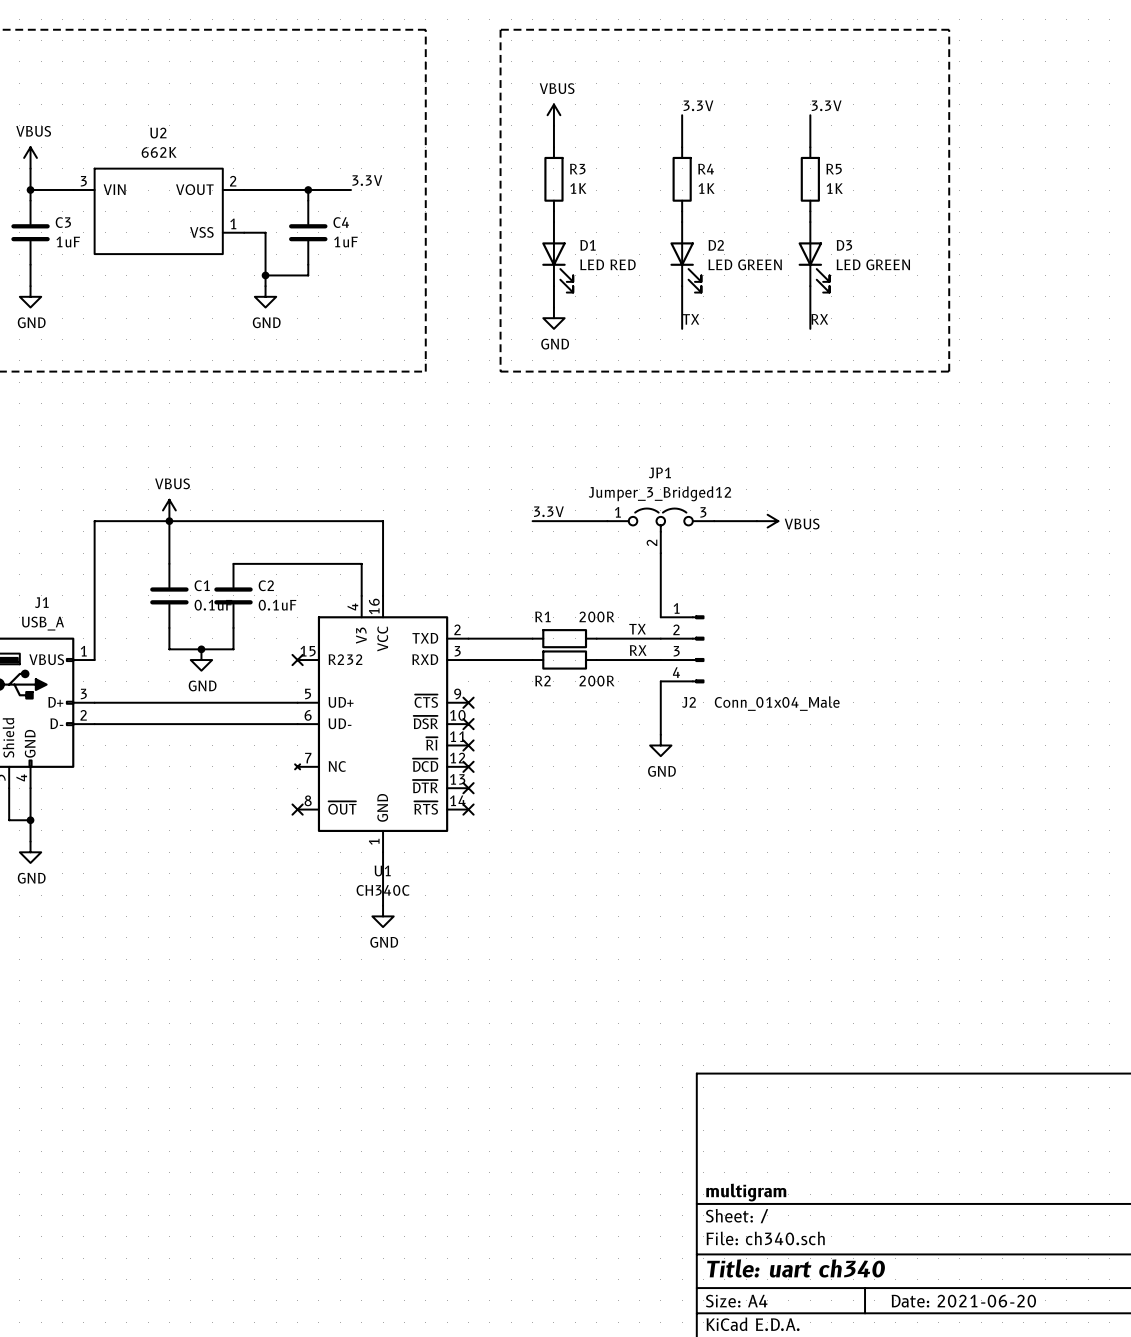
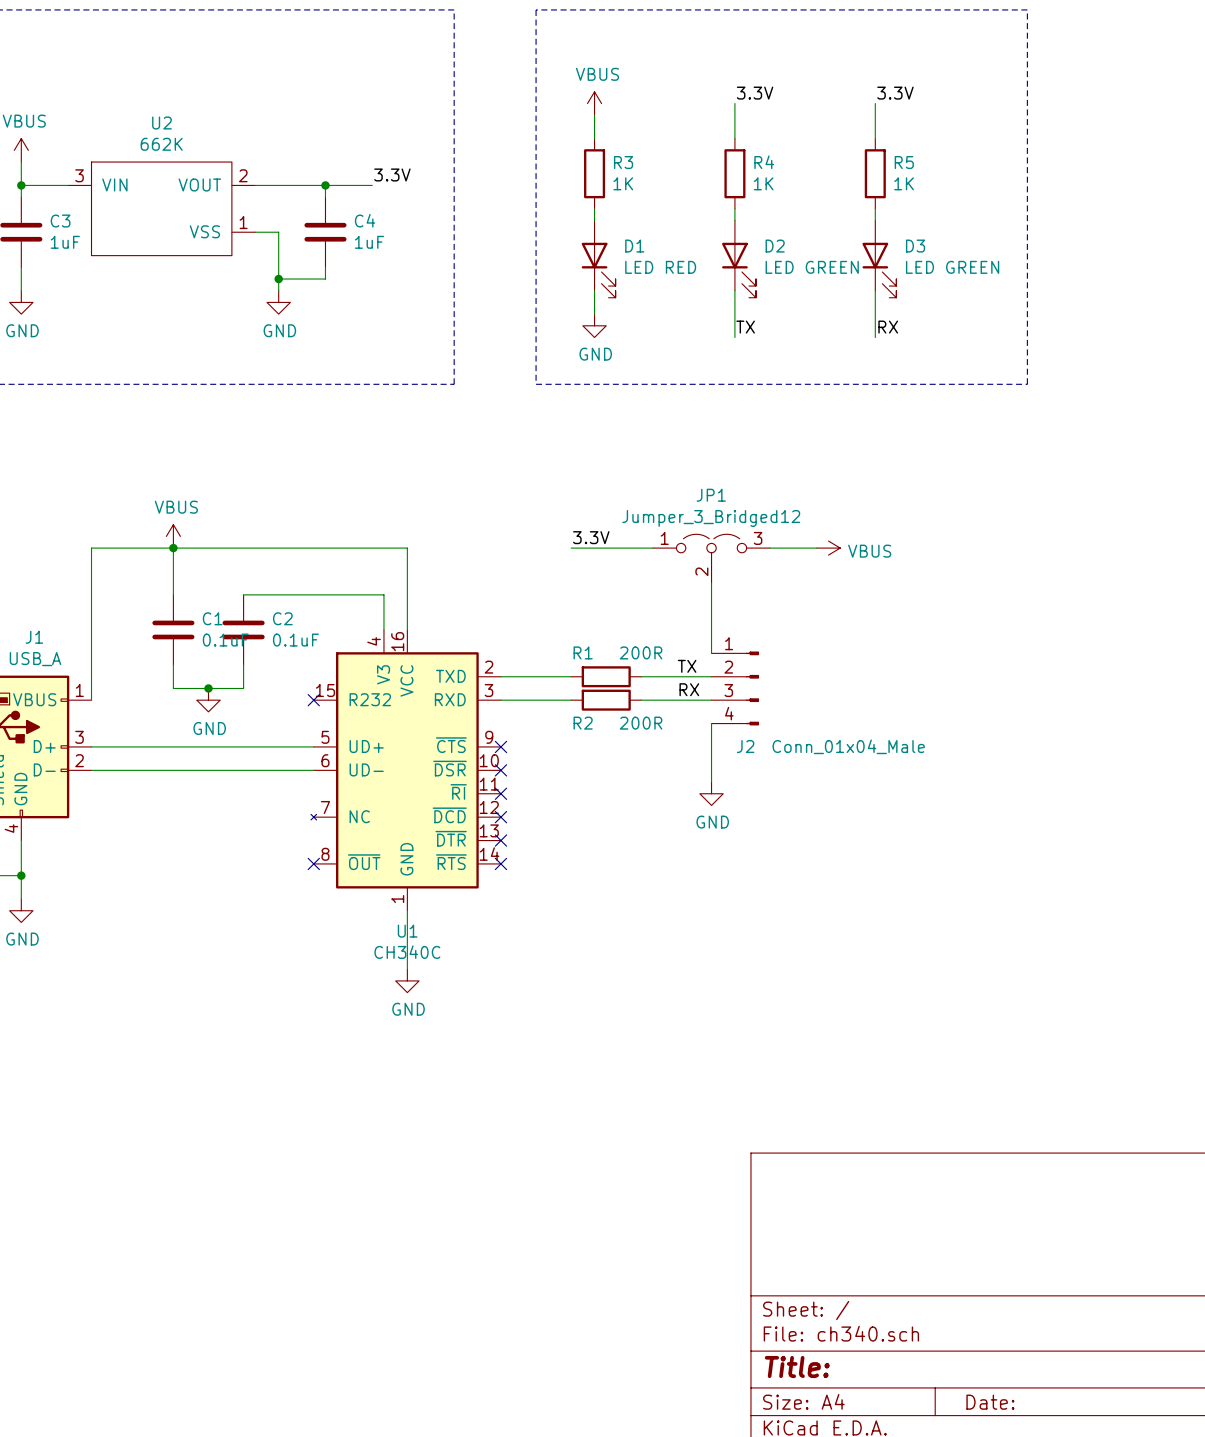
title block: multigram (746, 1192) -> none
title block: Title: uart ch340 (796, 1268) -> Title: (797, 1367)
title block: Date: 2021-06-20 (963, 1301) -> Date: (990, 1402)

